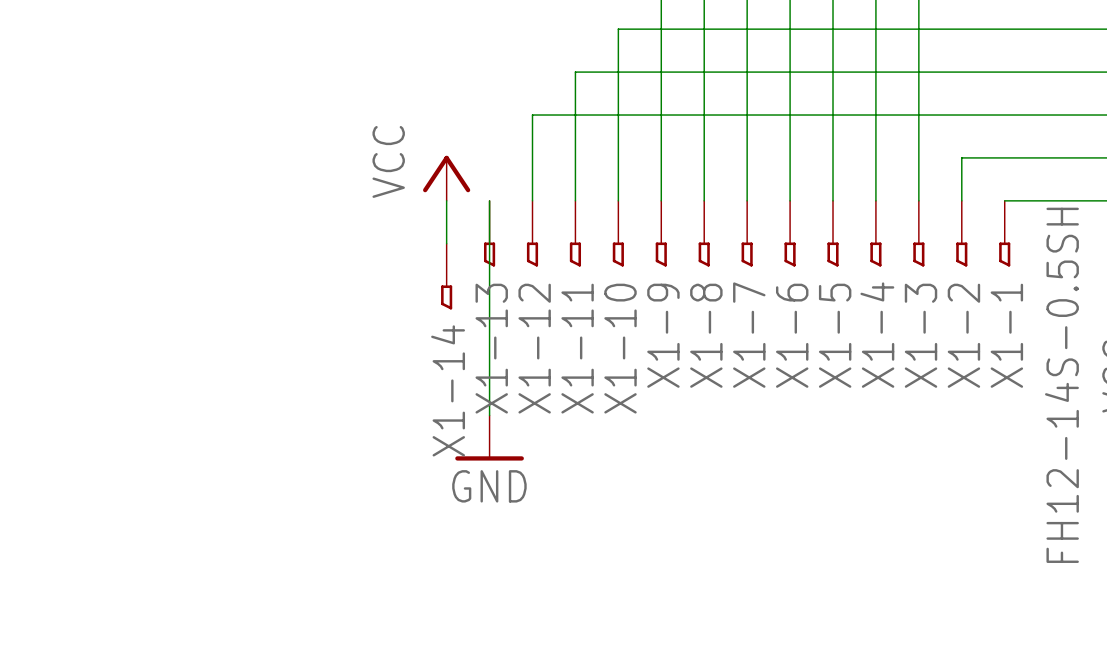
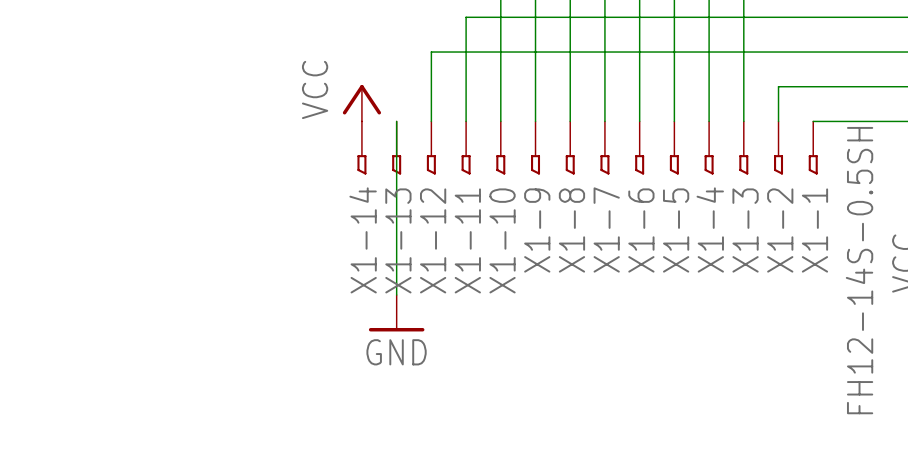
X1-14 position: (446, 276) -> (361, 148)

